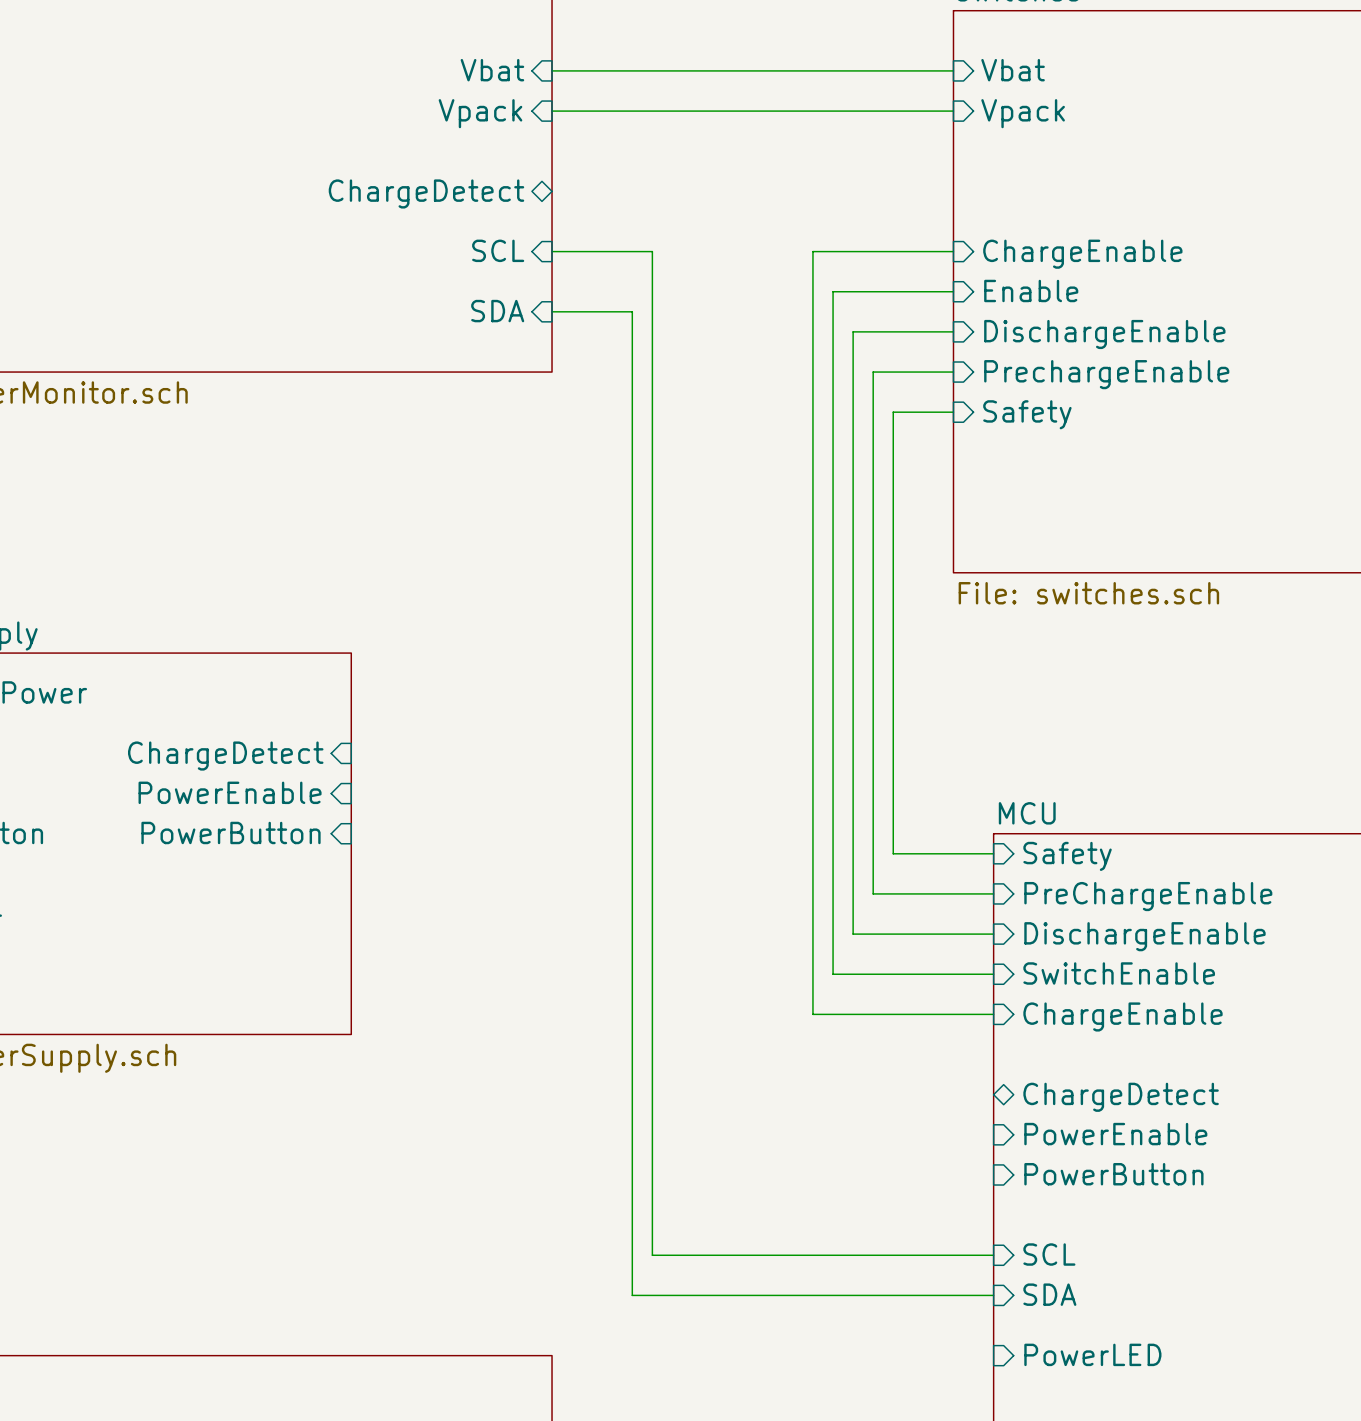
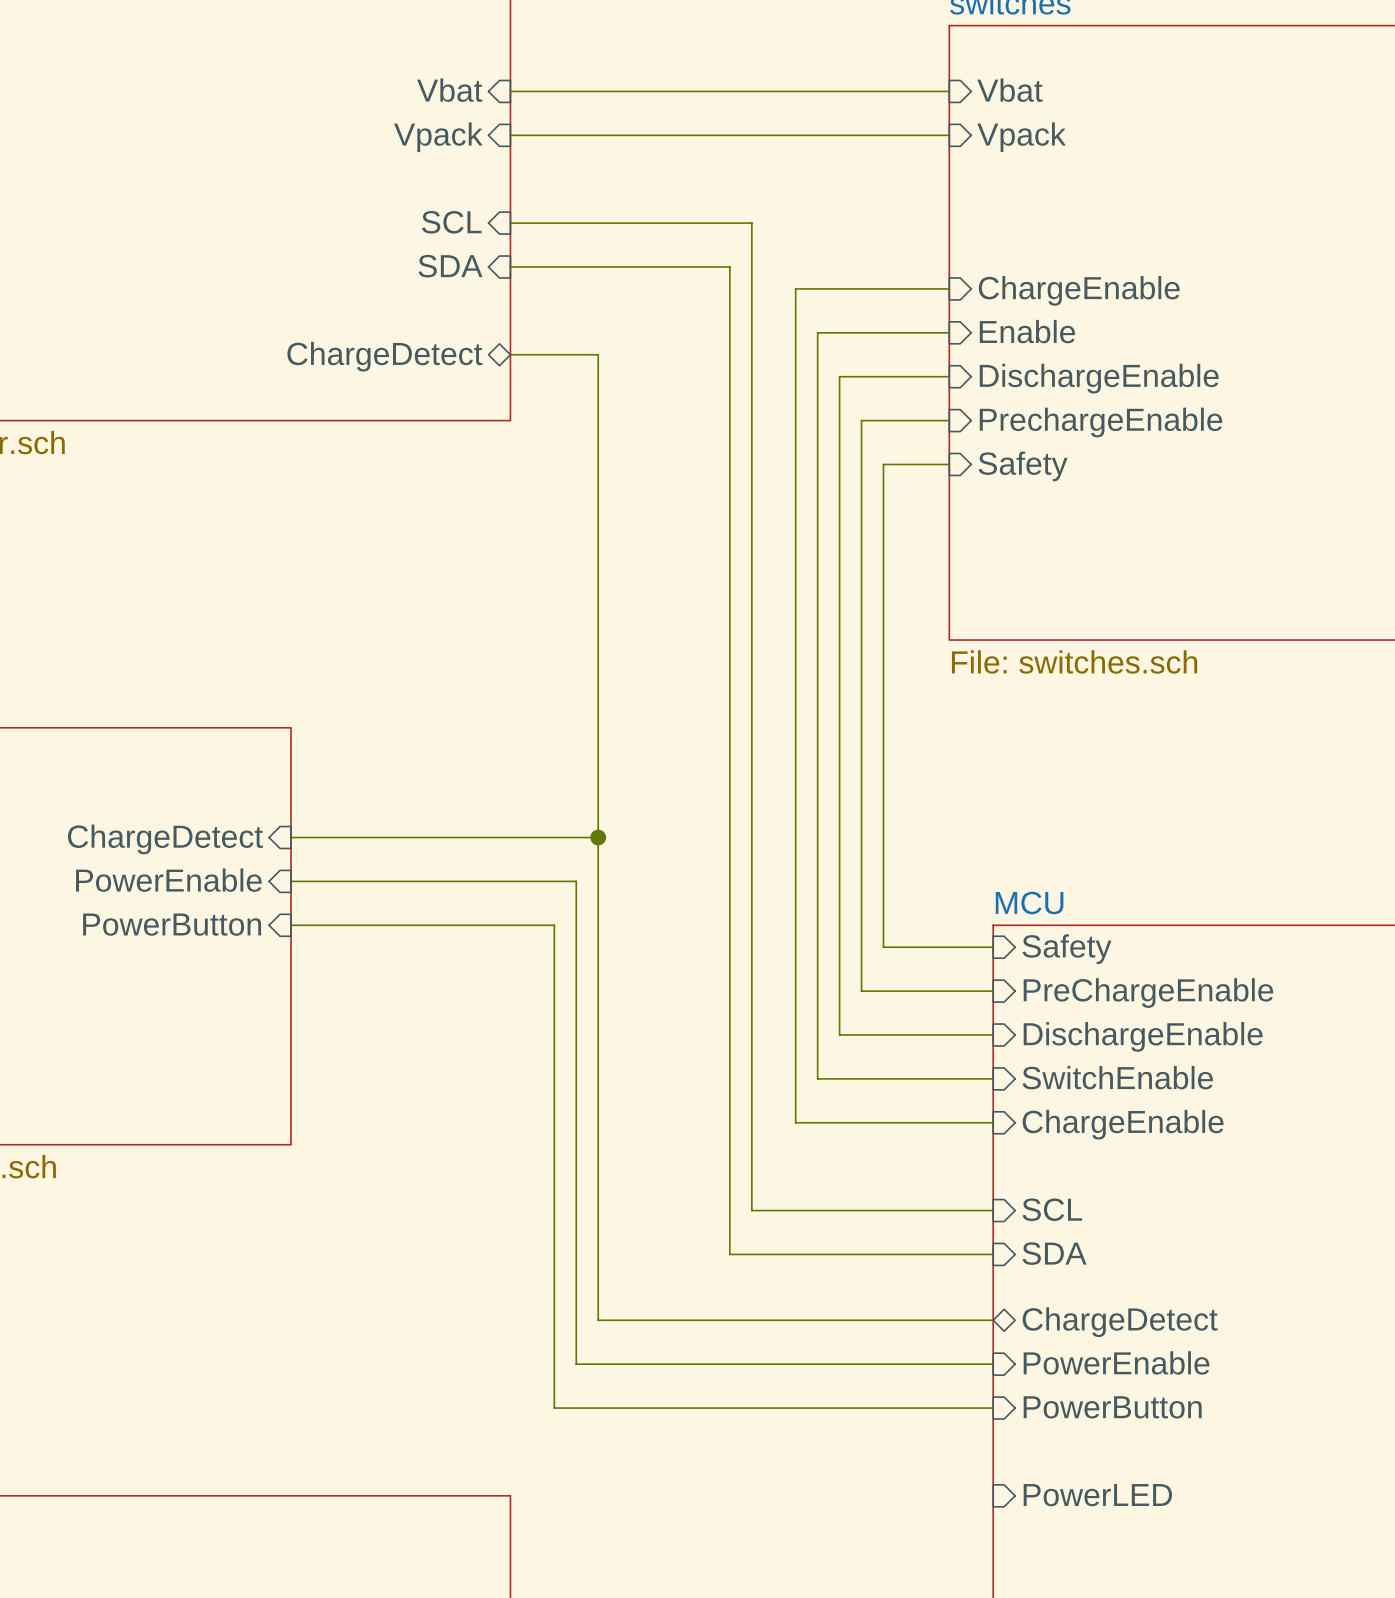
wire: none -> (510, 223) (751, 223) (751, 1210) (993, 1210)
sheet pin shape: bidirectional (426, 193) -> input (451, 222)
sheet pin: ChargeDetect (426, 193) -> SCL (451, 222)
sheet pin: none -> SDA (450, 266)
wire: none -> (510, 266) (729, 266) (729, 1254) (993, 1254)
sheet pin: SCL (498, 250) -> none
wire: (552, 251) (652, 251) (652, 1255) (993, 1255) -> none
sheet pin shape: input (497, 311) -> bidirectional (384, 356)
sheet pin: SDA (497, 311) -> ChargeDetect (384, 356)
wire: none -> (291, 837) (598, 837)
junction: none -> (598, 837)
wire: none -> (291, 881) (576, 881) (576, 1364) (993, 1364)
wire: none -> (291, 925) (554, 925) (554, 1408) (993, 1408)
sheet pin shape: bidirectional (1121, 1097) -> input (1052, 1209)
sheet pin: ChargeDetect (1121, 1097) -> SCL (1052, 1209)
sheet pin: PowerEnable (1115, 1134) -> SDA (1054, 1253)
sheet pin position: PowerButton (1113, 1174) -> PowerButton (1112, 1407)
wire: (632, 1195) (632, 1295) (993, 1295) -> (598, 1320) (993, 1320)
sheet pin: none -> ChargeDetect (1120, 1322)
sheet pin: none -> PowerEnable (1116, 1362)
sheet pin: SCL (1049, 1254) -> none
sheet pin: SDA (1049, 1294) -> none

